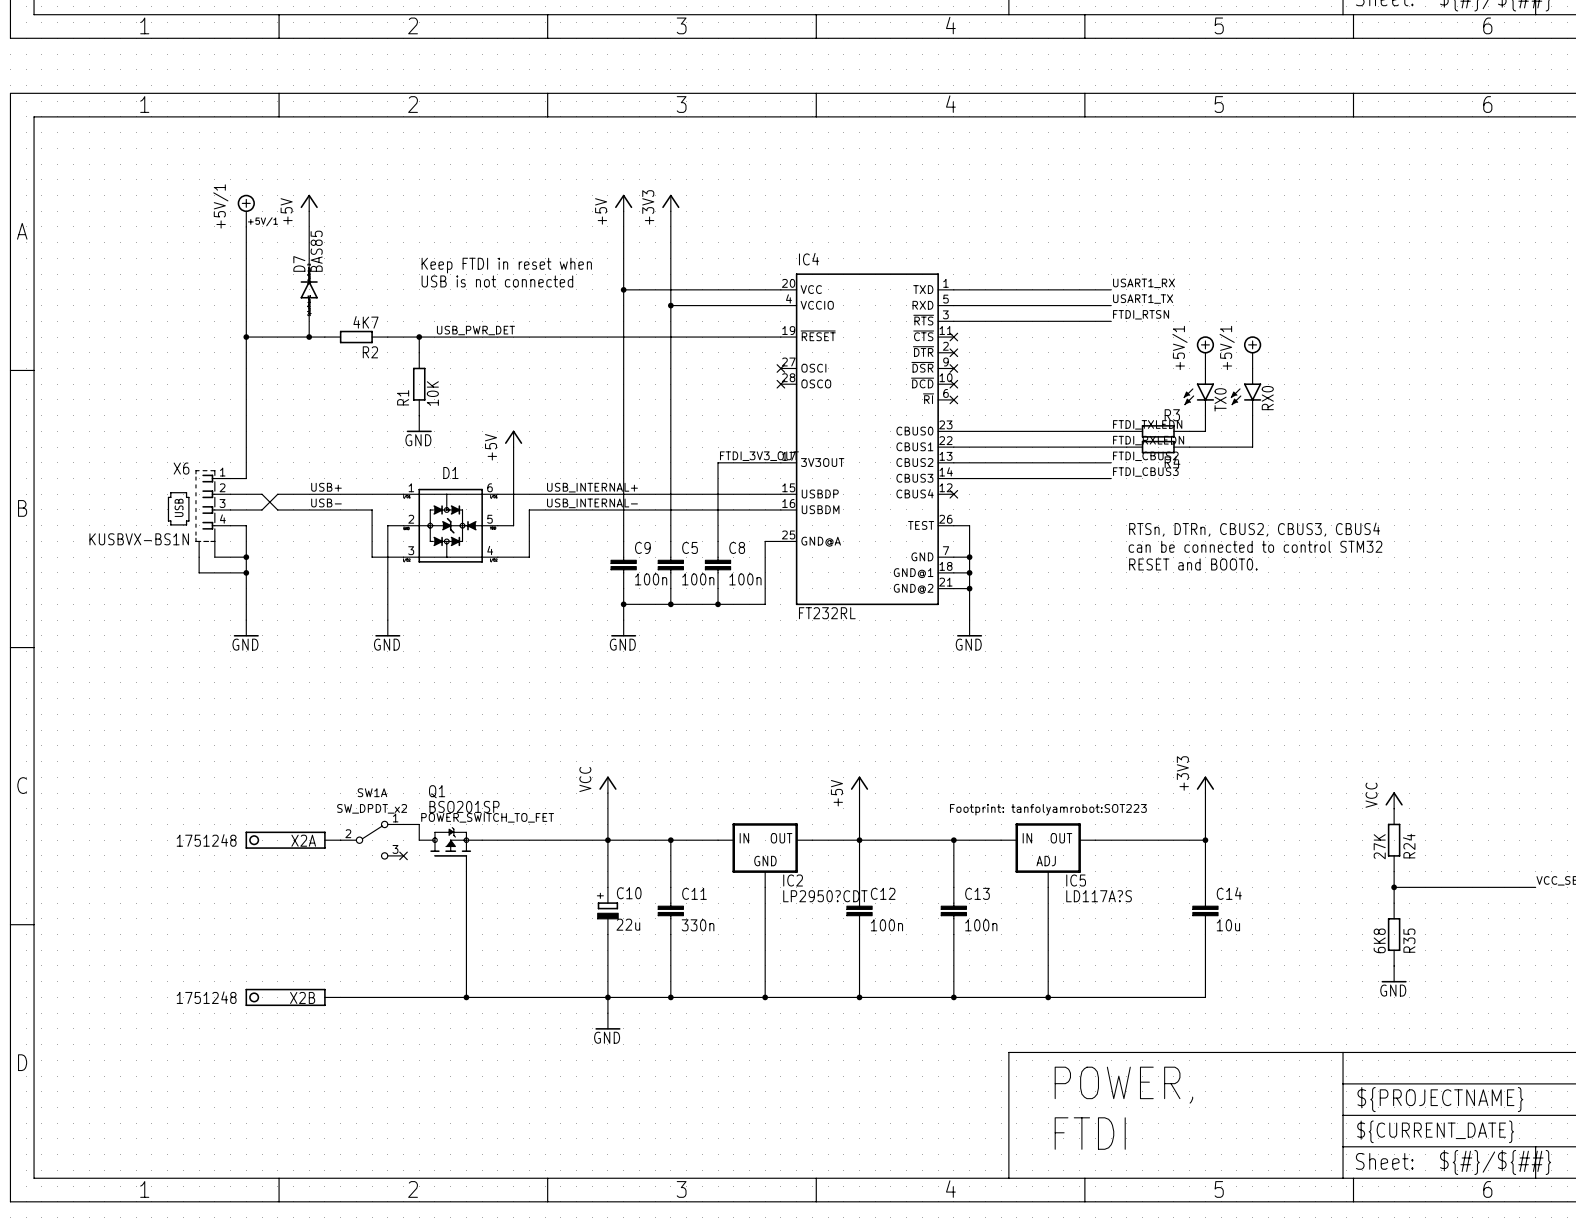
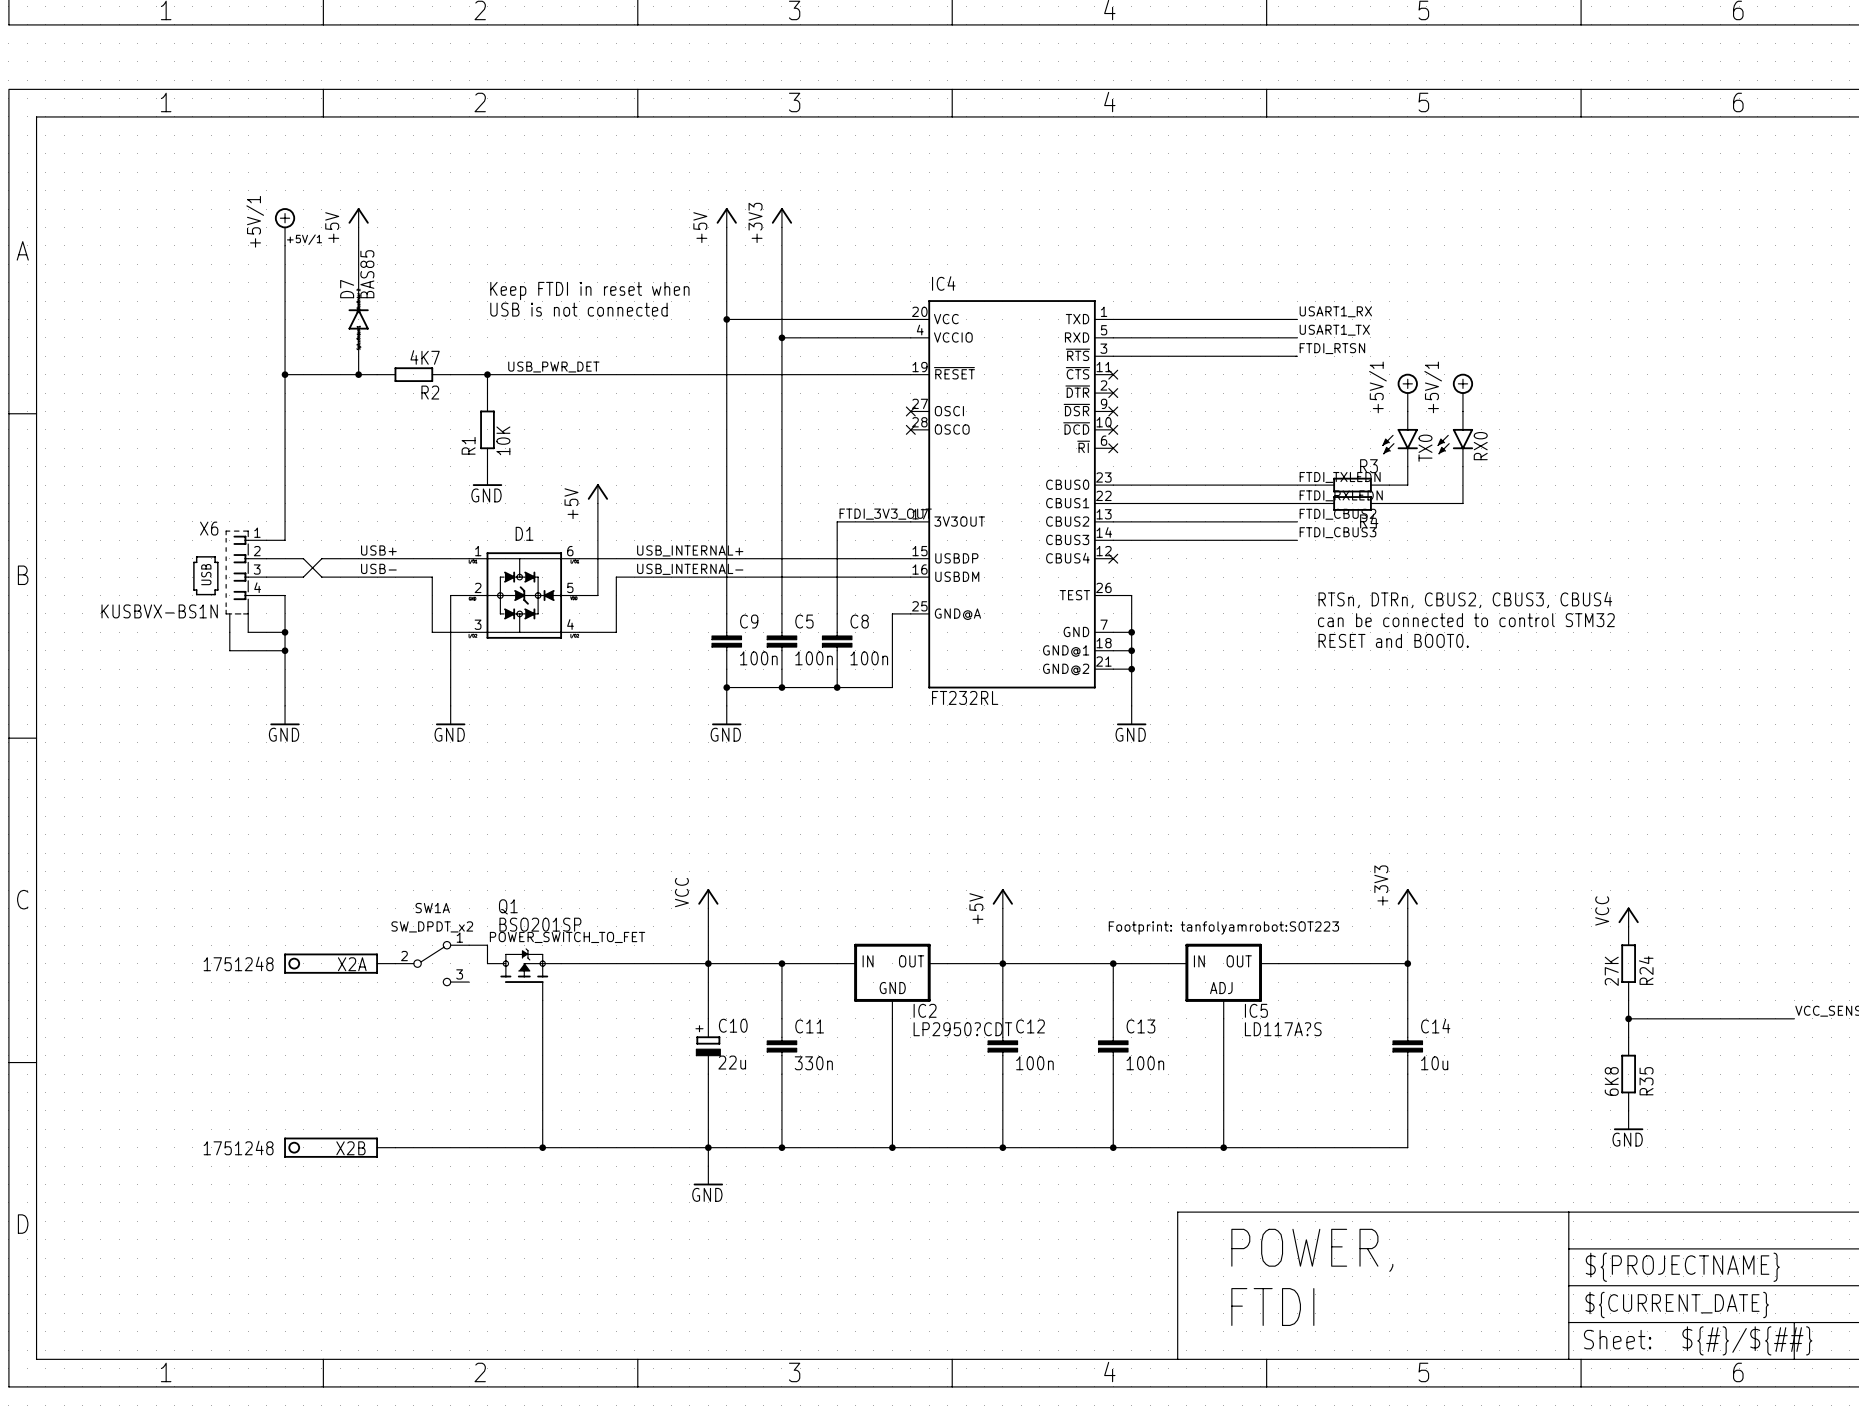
no-connect mark: (403, 855) -> none

